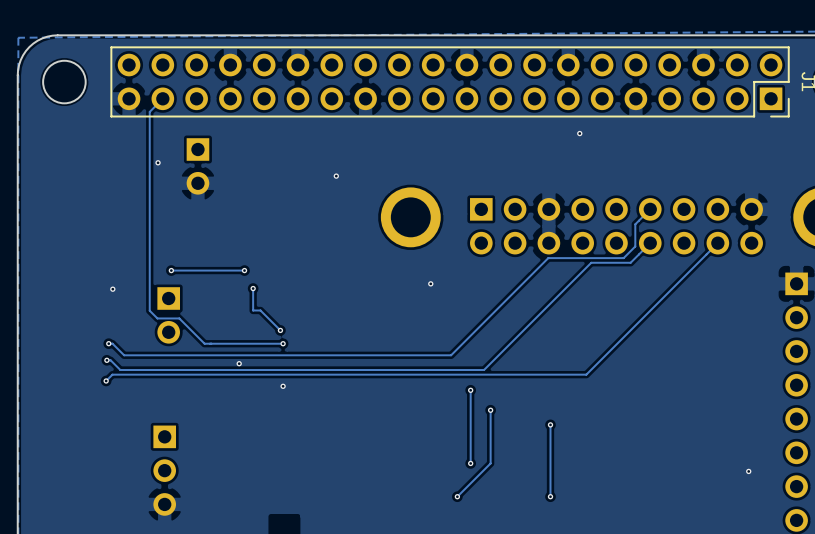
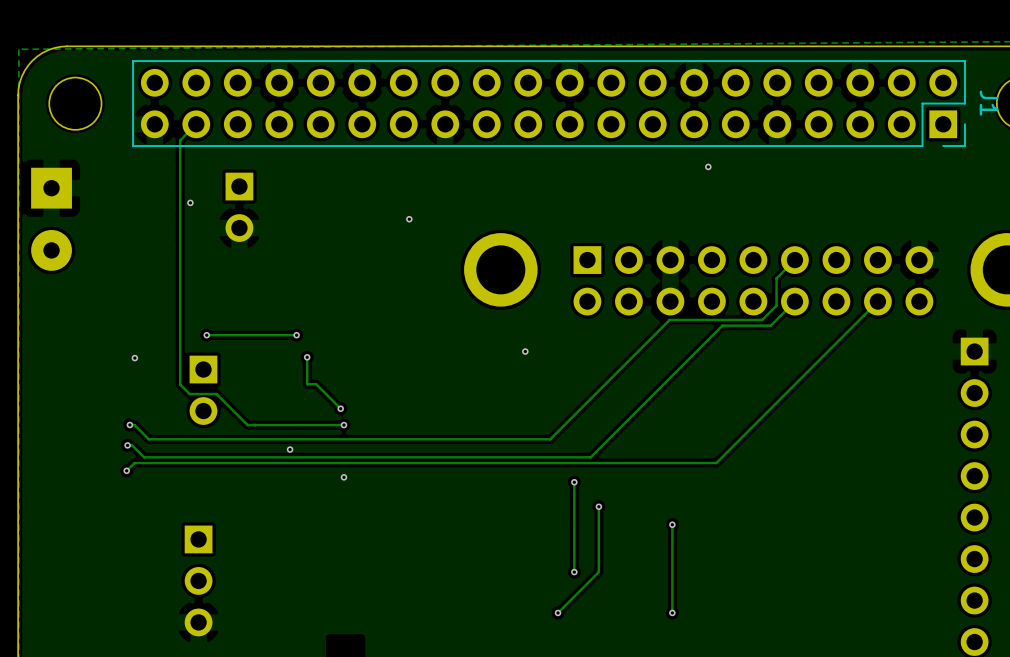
part: none -> (51, 219)
via: (748, 471) -> none

